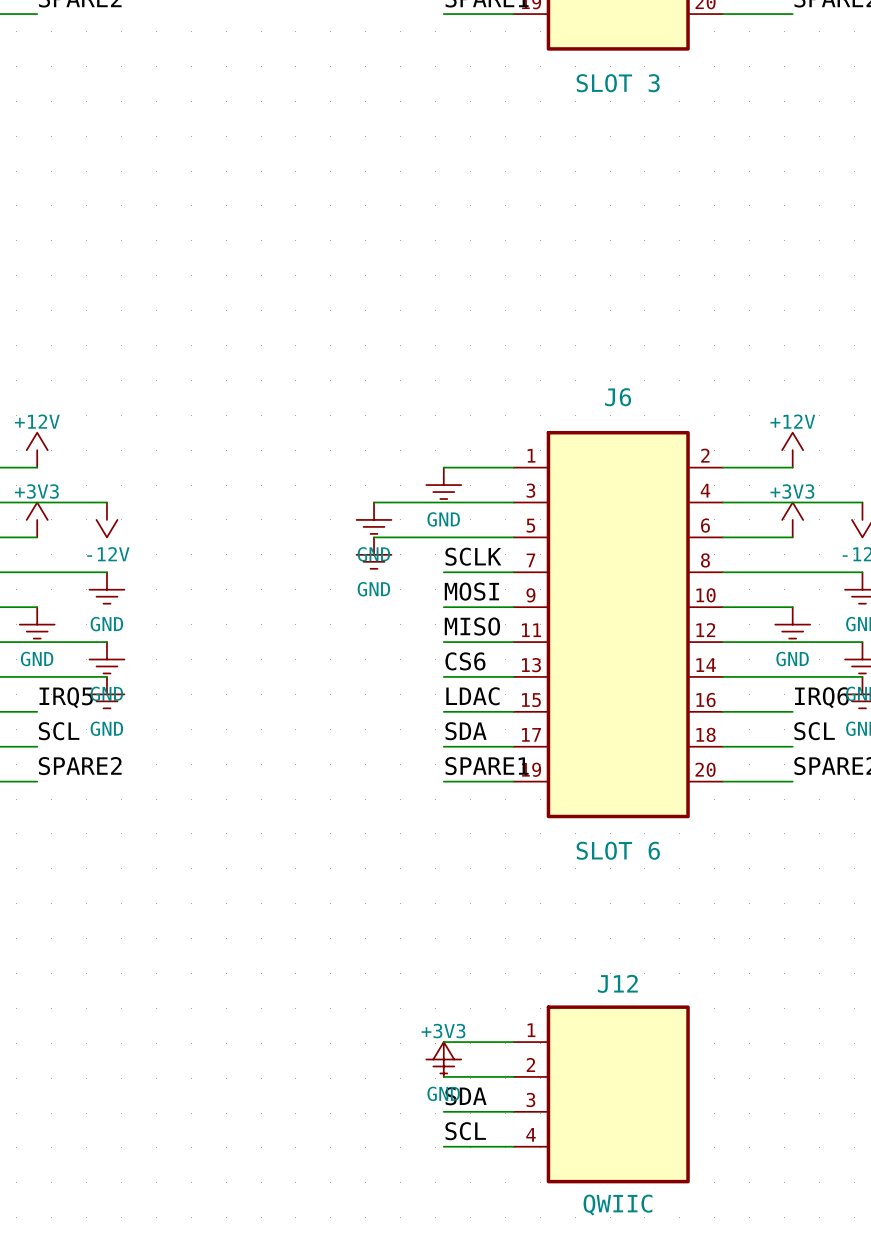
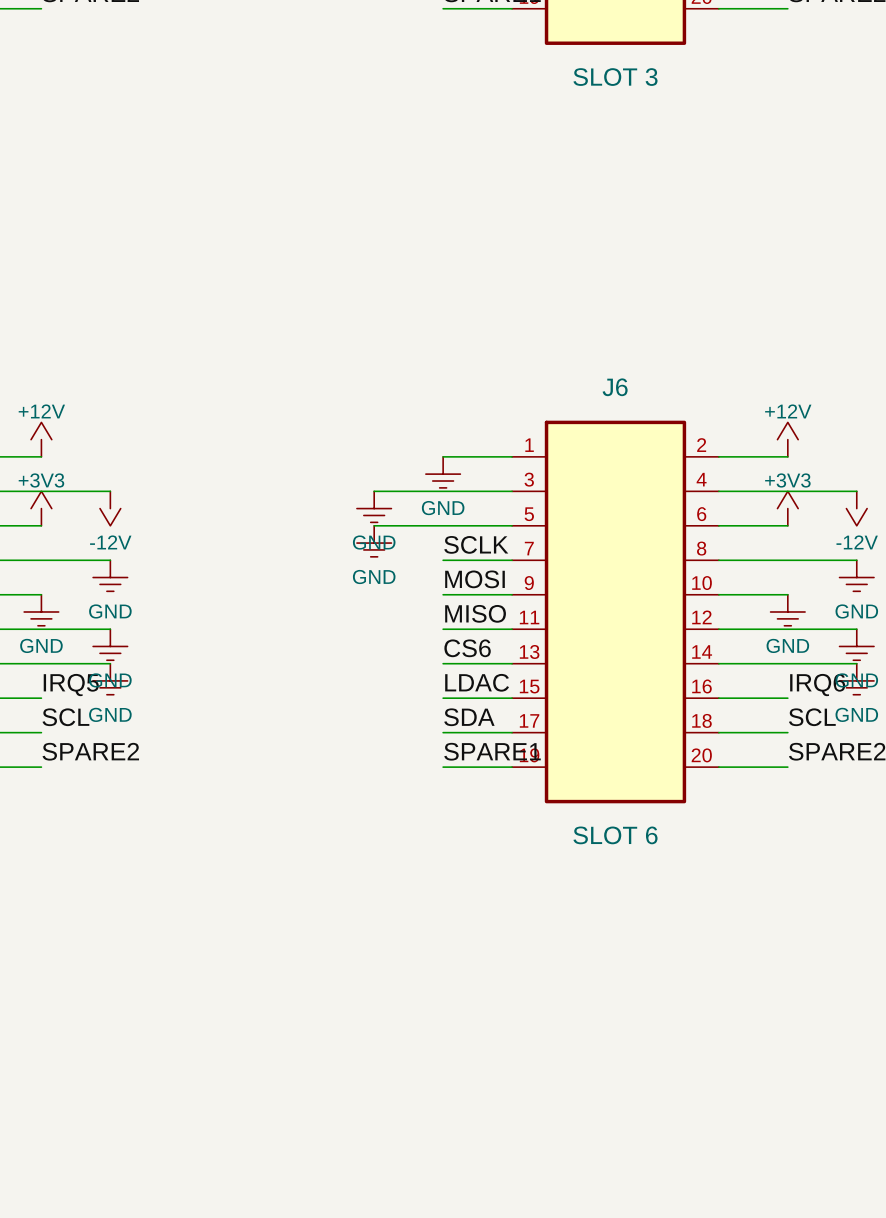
wire: (443, 1042) (513, 1042) -> none
power symbol: GND (443, 1057) -> none
power symbol: +3V3 (443, 1059) -> none
wire: (443, 1076) (513, 1076) -> none
J12: QWIIC (601, 1094) -> none
label: SDA (465, 1096) -> none
wire: (443, 1111) (513, 1111) -> none
label: SCL (465, 1131) -> none
wire: (443, 1146) (513, 1146) -> none

